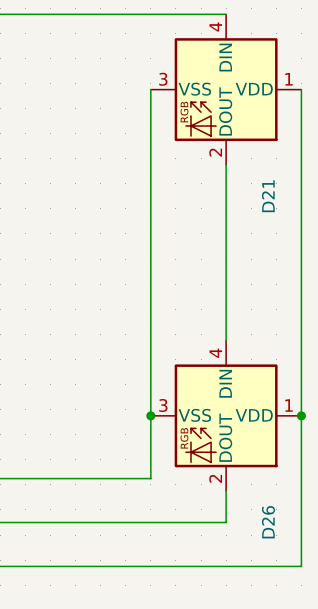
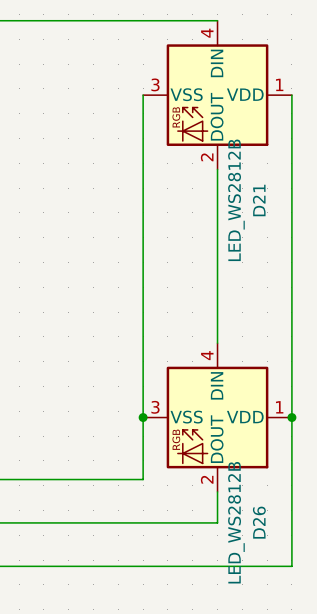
D21 value: none -> LED_WS2812B (236, 200)
D26 value: none -> LED_WS2812B (236, 522)

